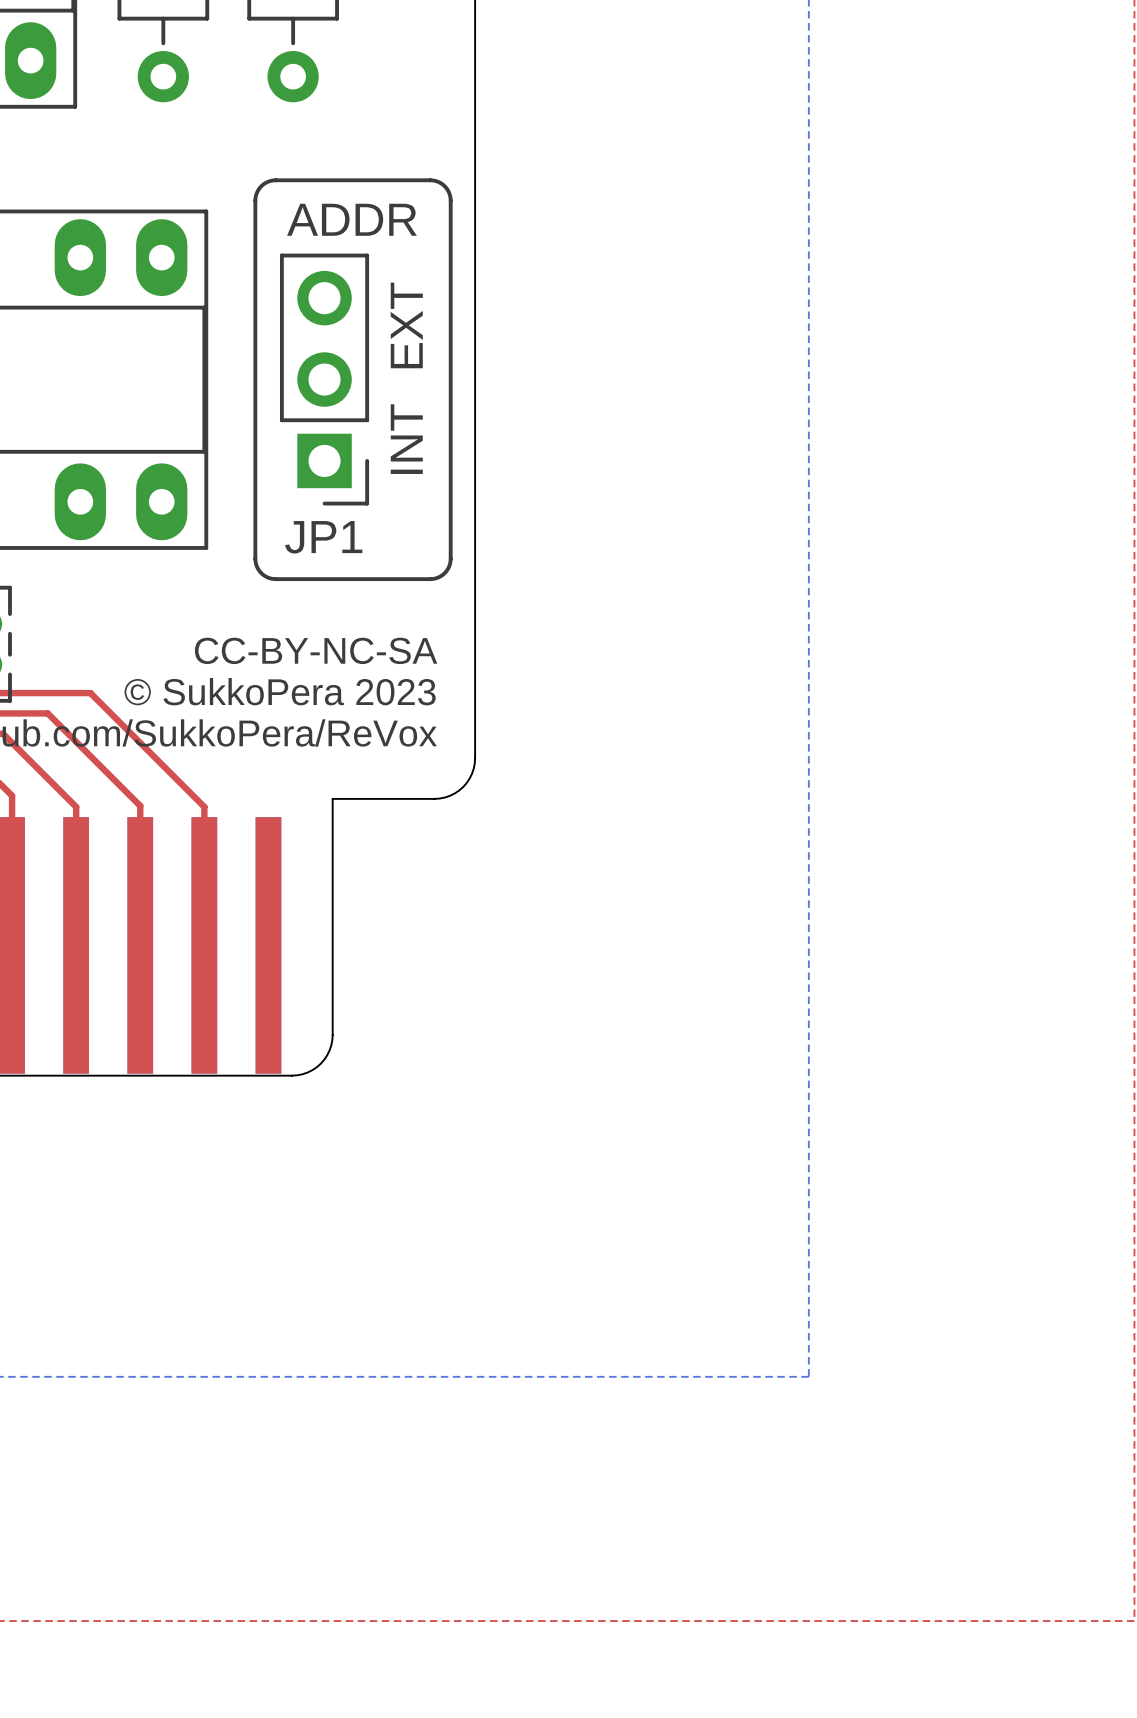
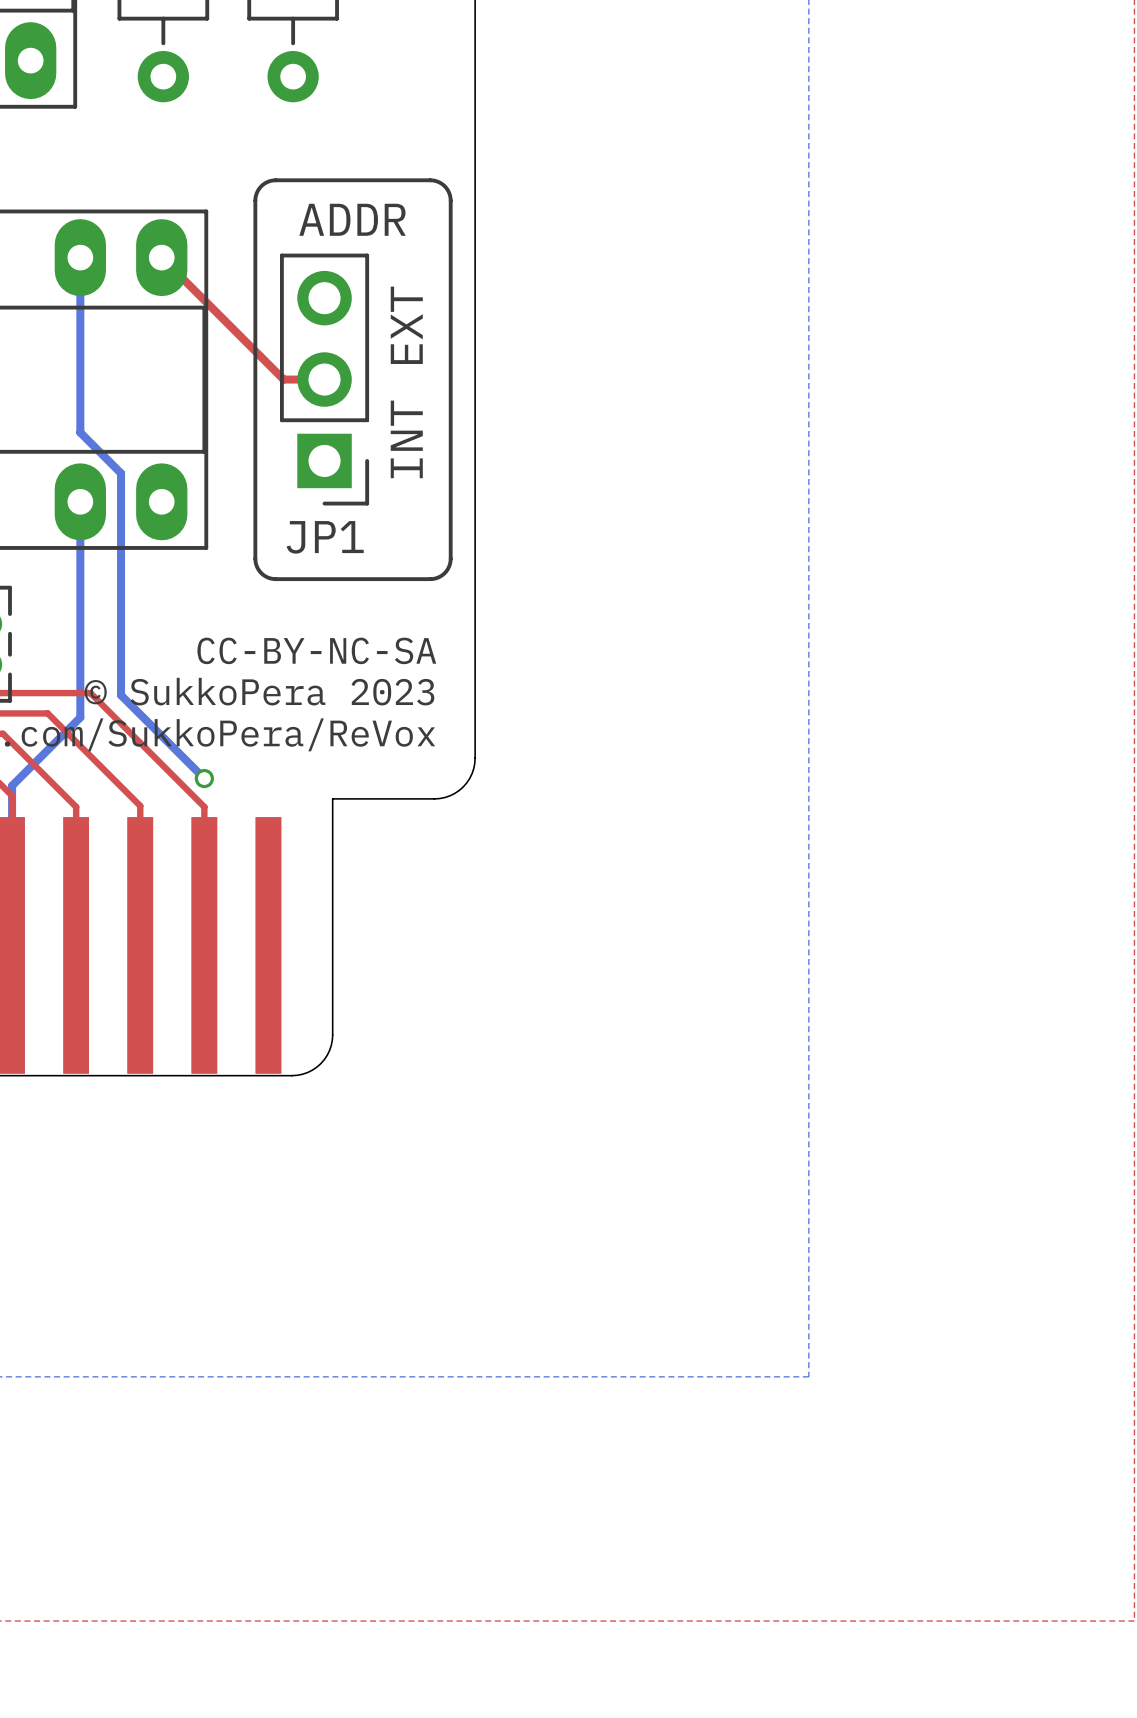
bottom track: none -> (80, 257) (80, 432) (121, 473) (121, 695) (204, 778)
top track: none -> (161, 257) (283, 379) (324, 379)
bottom track: none -> (80, 501) (80, 717) (12, 785) (12, 945)
via: none -> (204, 778)

